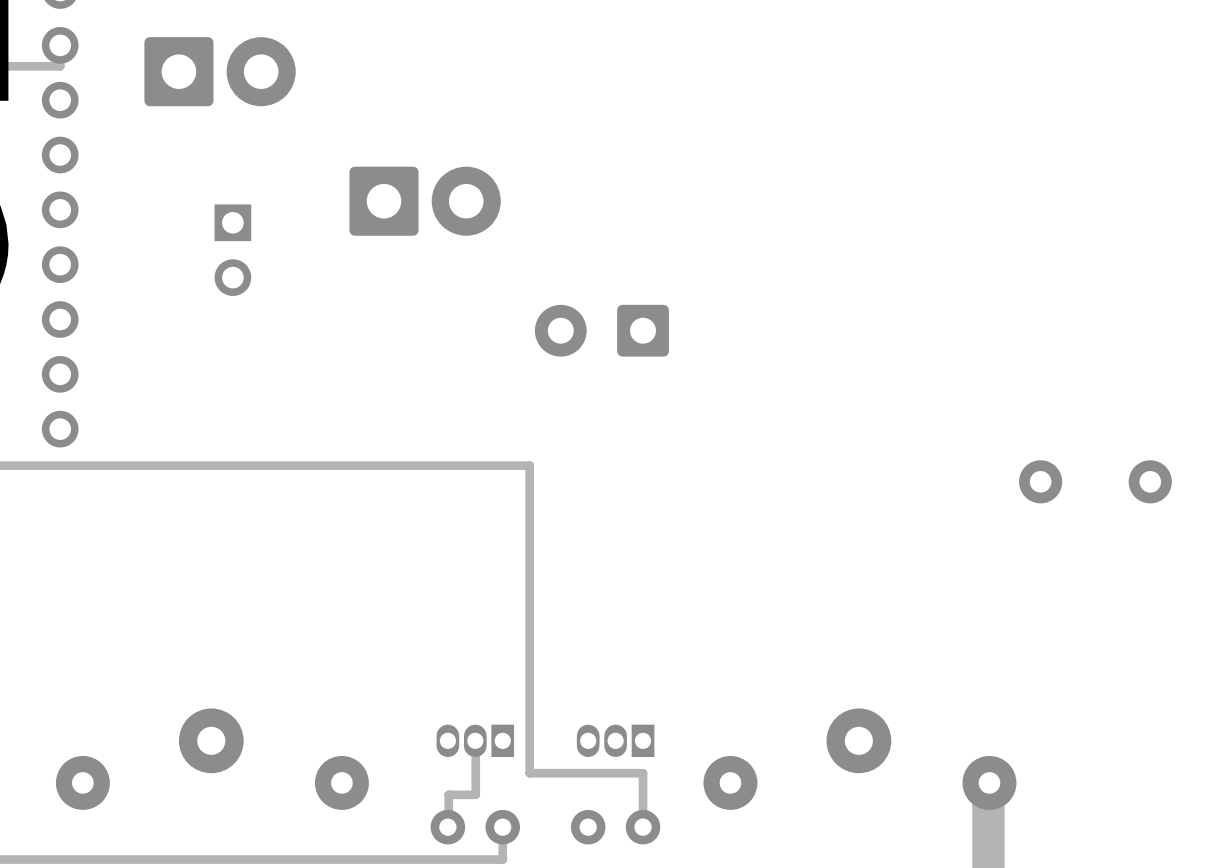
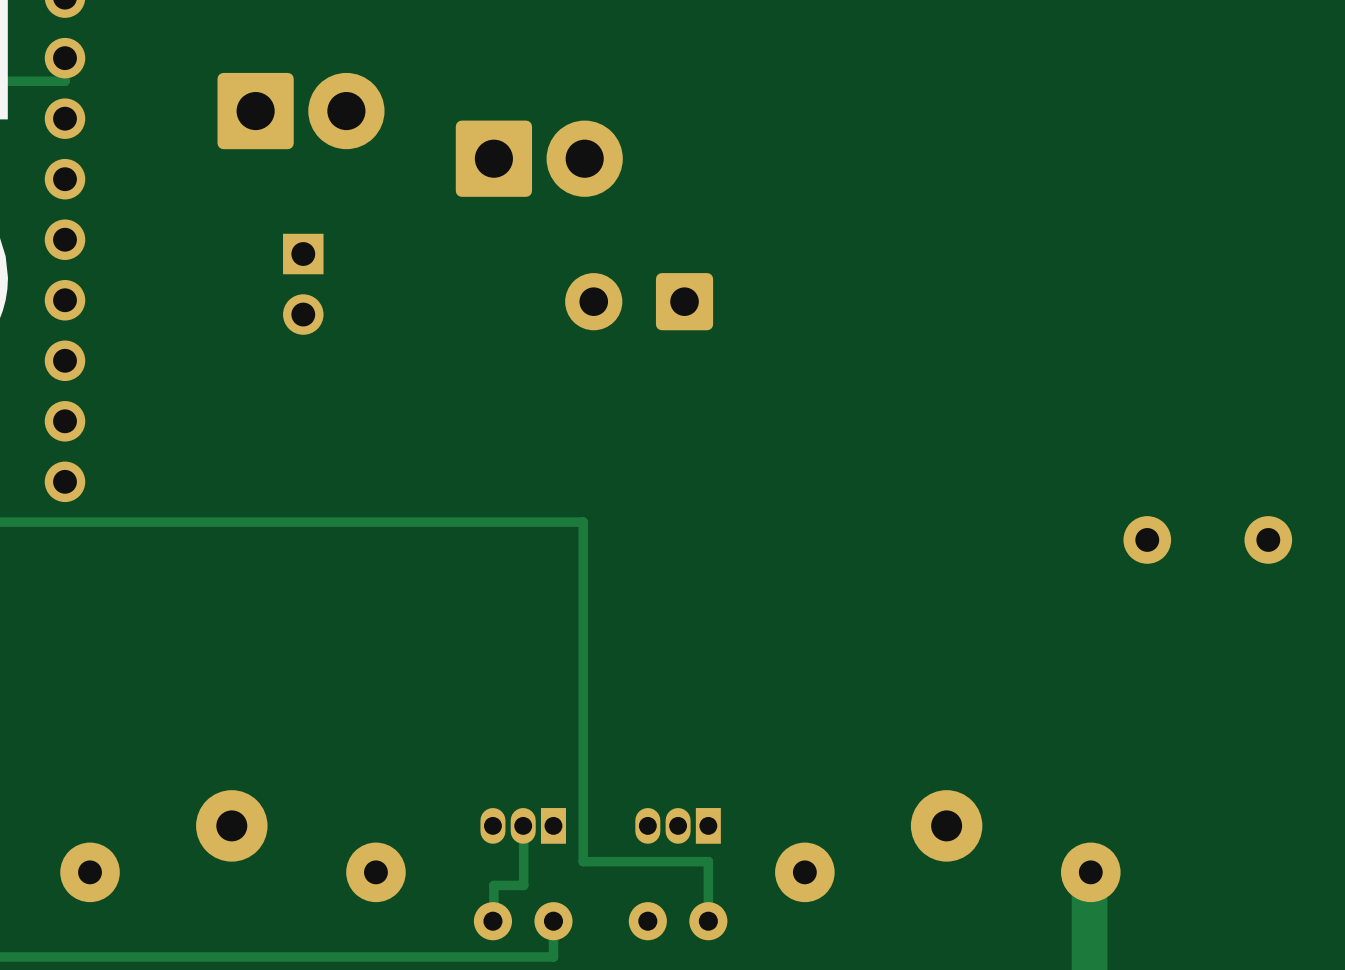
part position: (220, 71) -> (301, 111)
part position: (425, 201) -> (539, 158)
part position: (232, 250) -> (303, 284)
part position: (601, 330) -> (639, 301)

